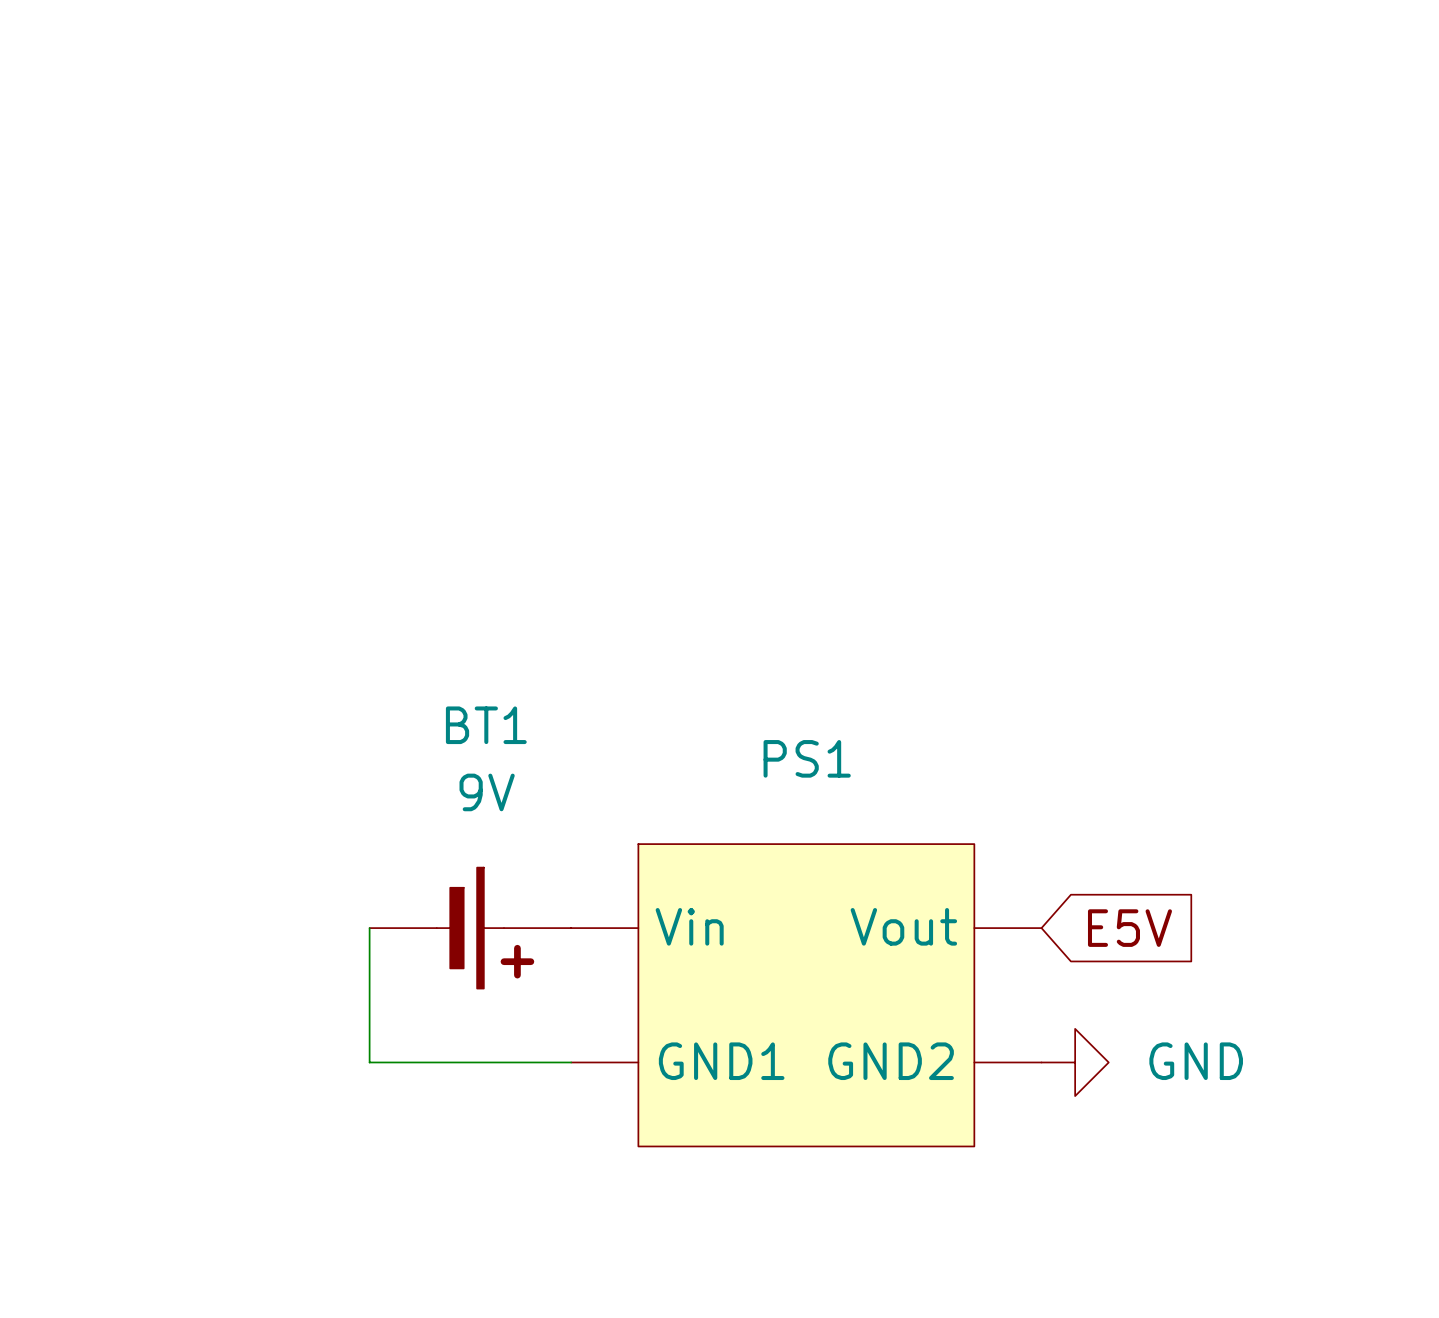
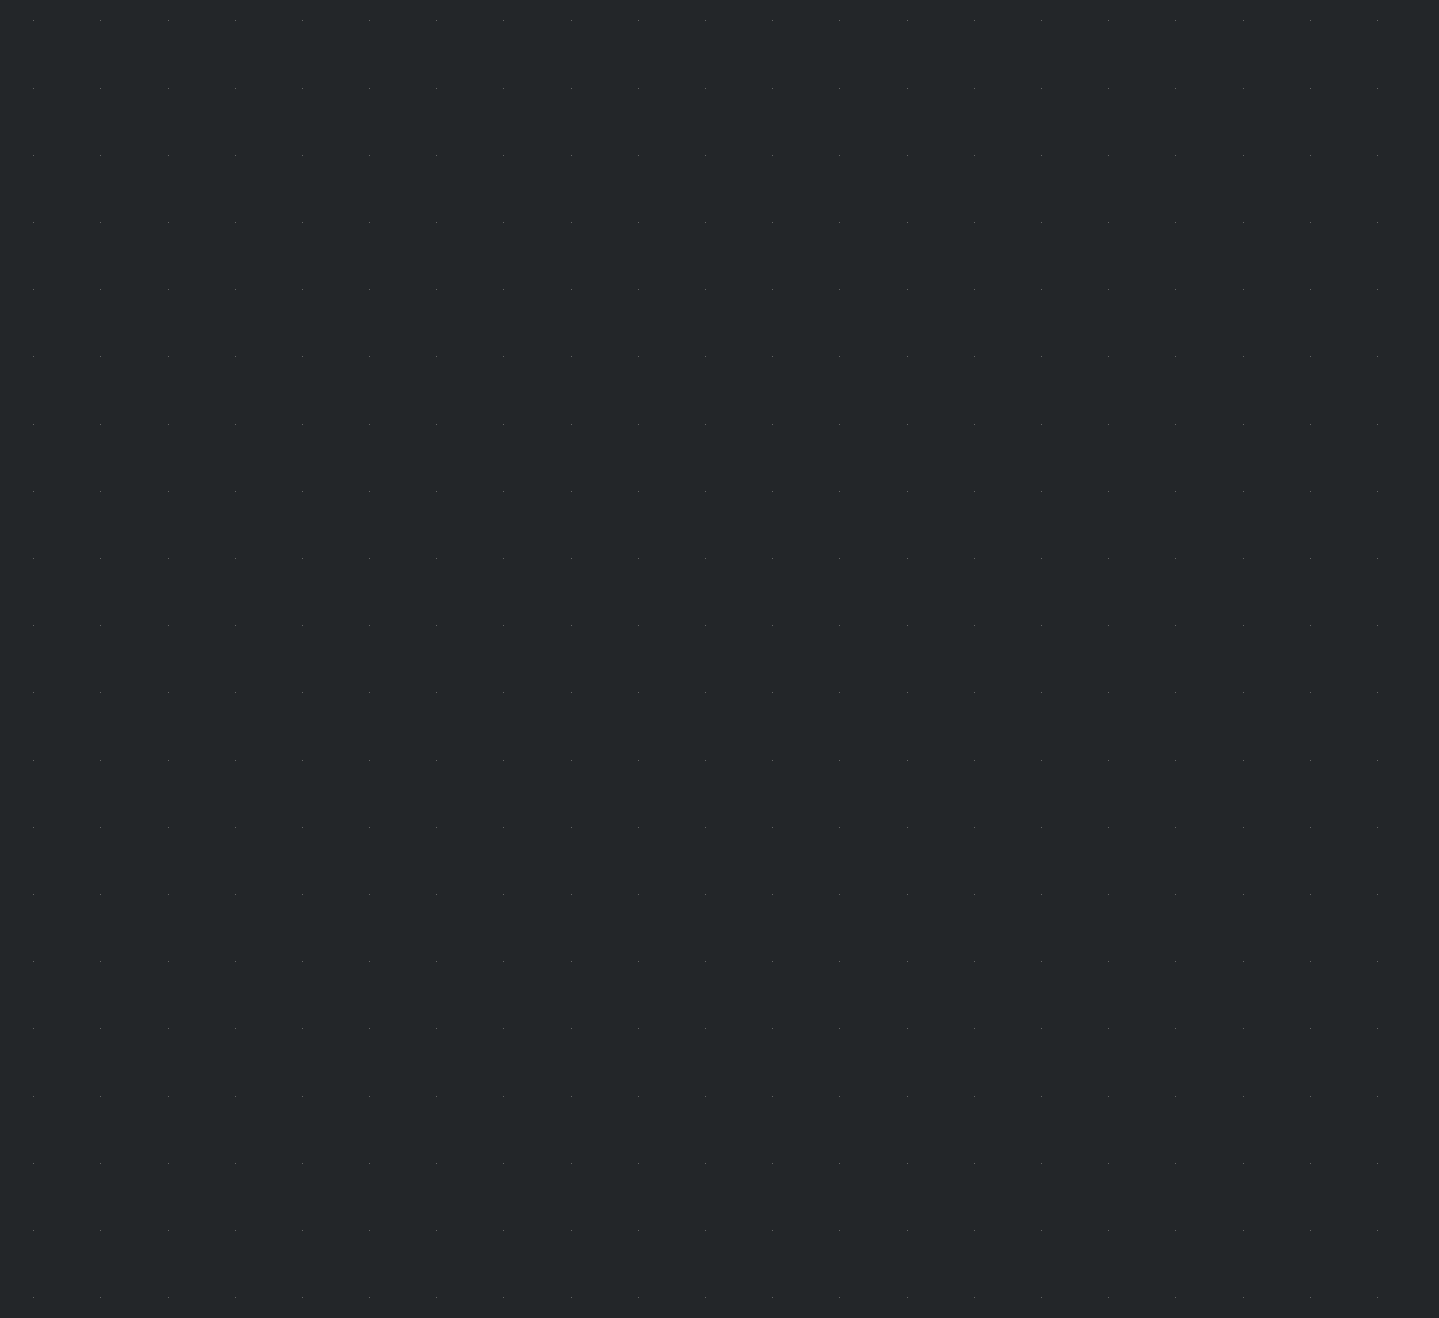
wire: (369, 928) (369, 1062) (571, 1062) -> none
BT1: 9V (470, 928) -> none
global label: E5V (1129, 928) -> none
PS1: (806, 995) -> none
power symbol: GND (1075, 1062) -> none

